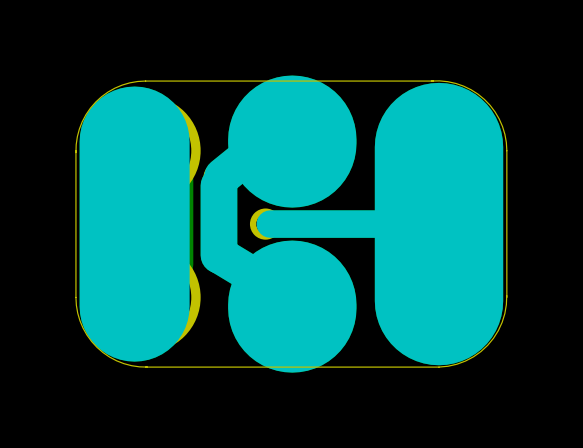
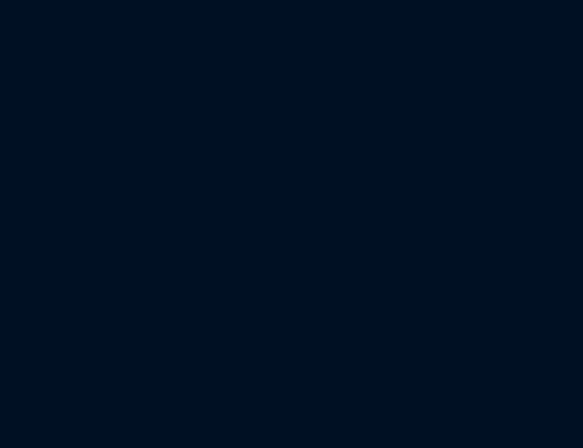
part: (291, 224) -> none

